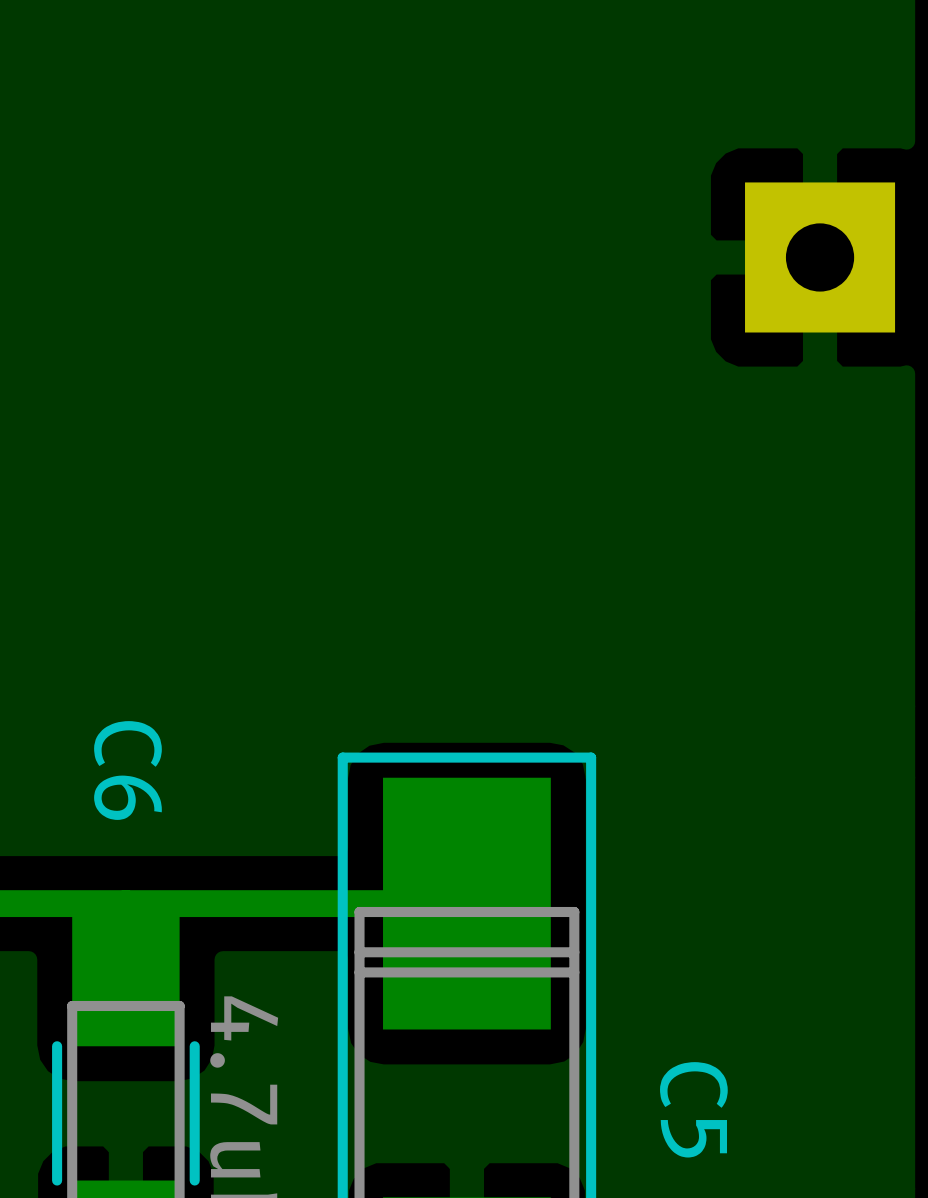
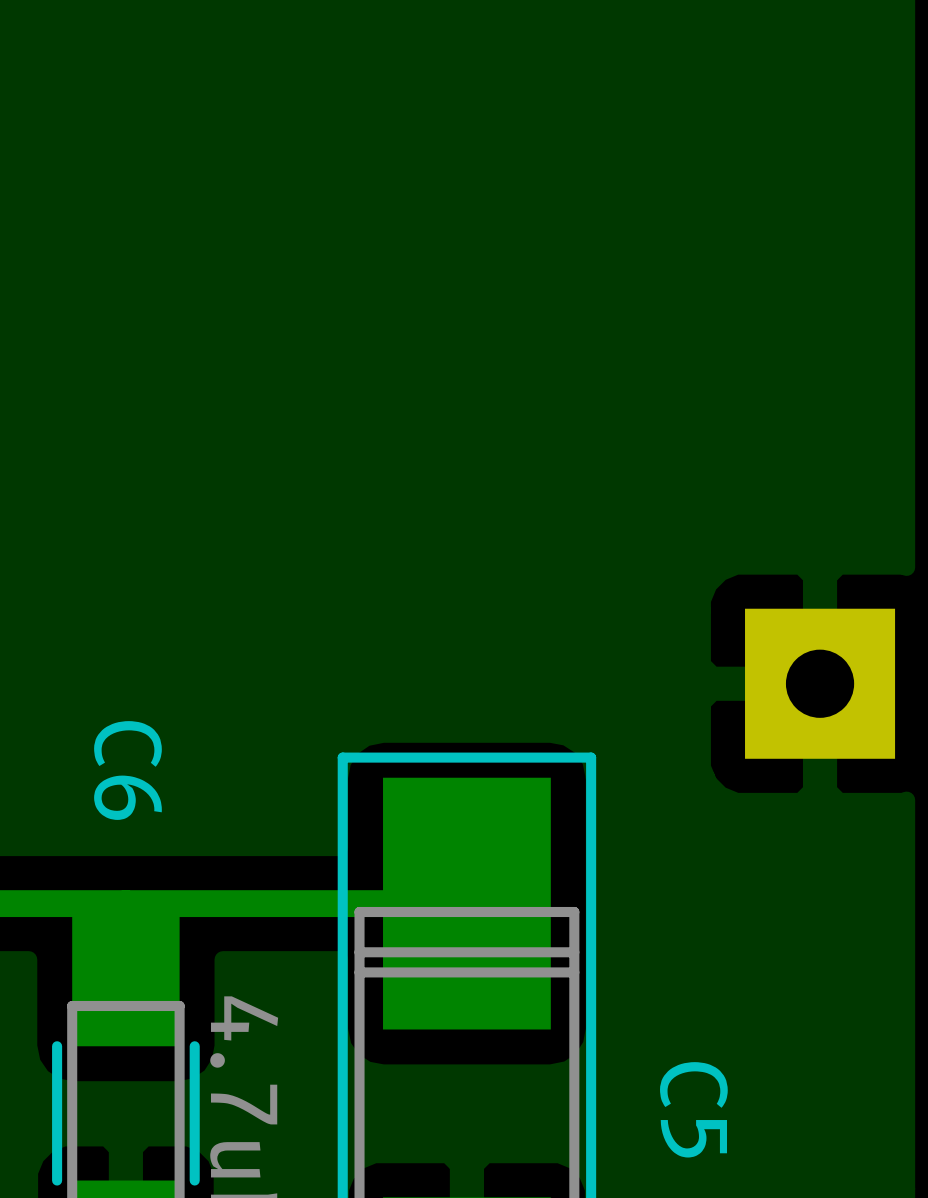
part position: (820, 257) -> (820, 683)

